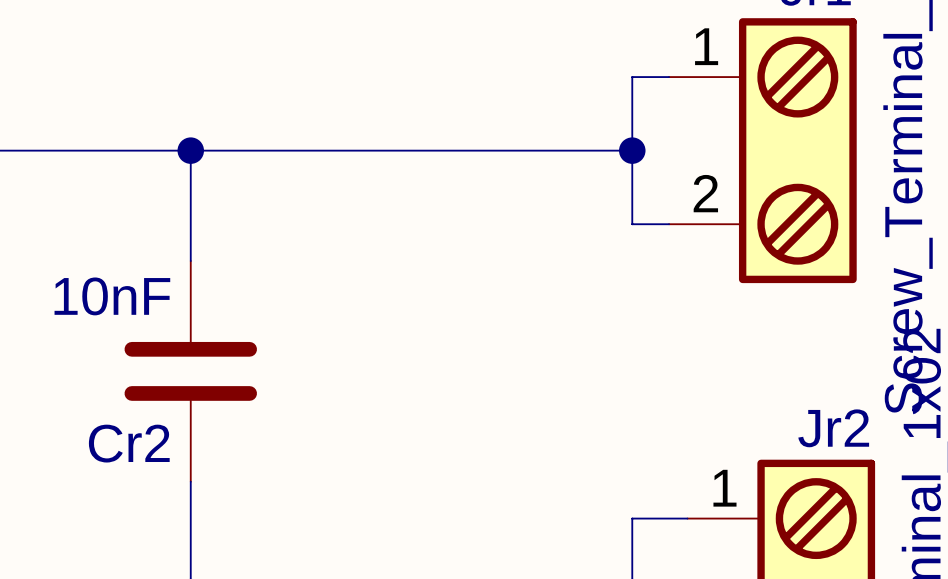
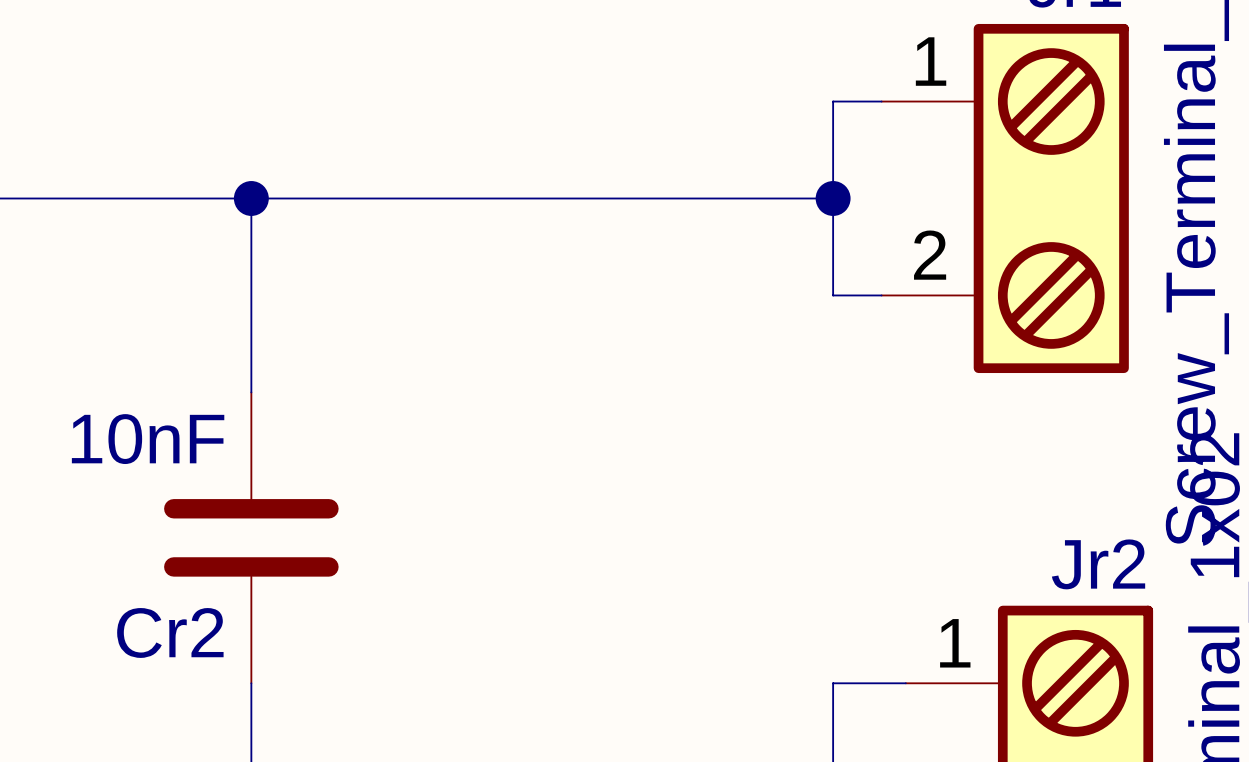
Cr2 position: (190, 371) -> (251, 537)

